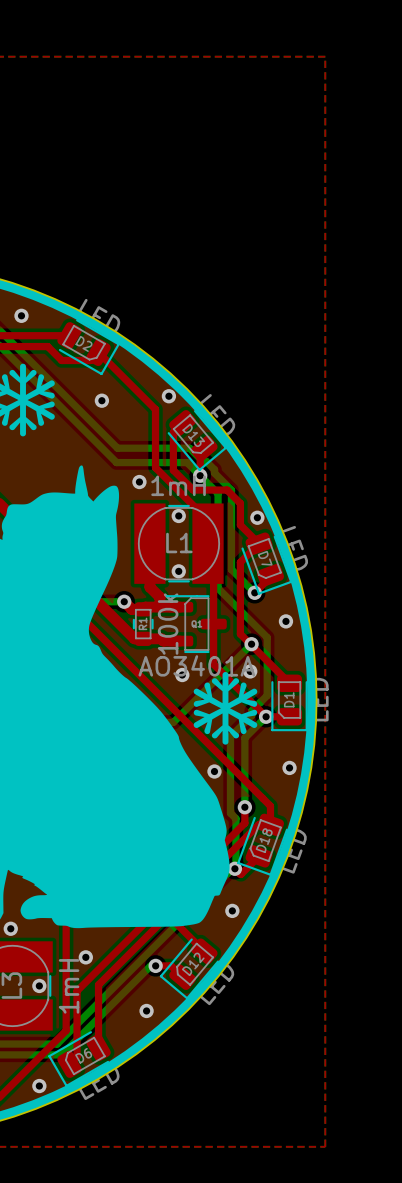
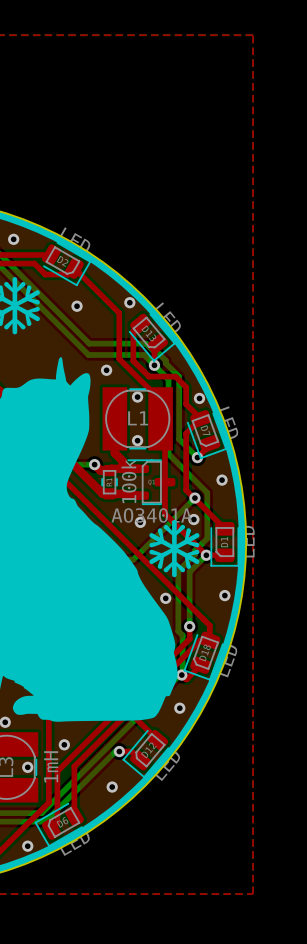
L1 value: 1mH (178, 485) -> none

